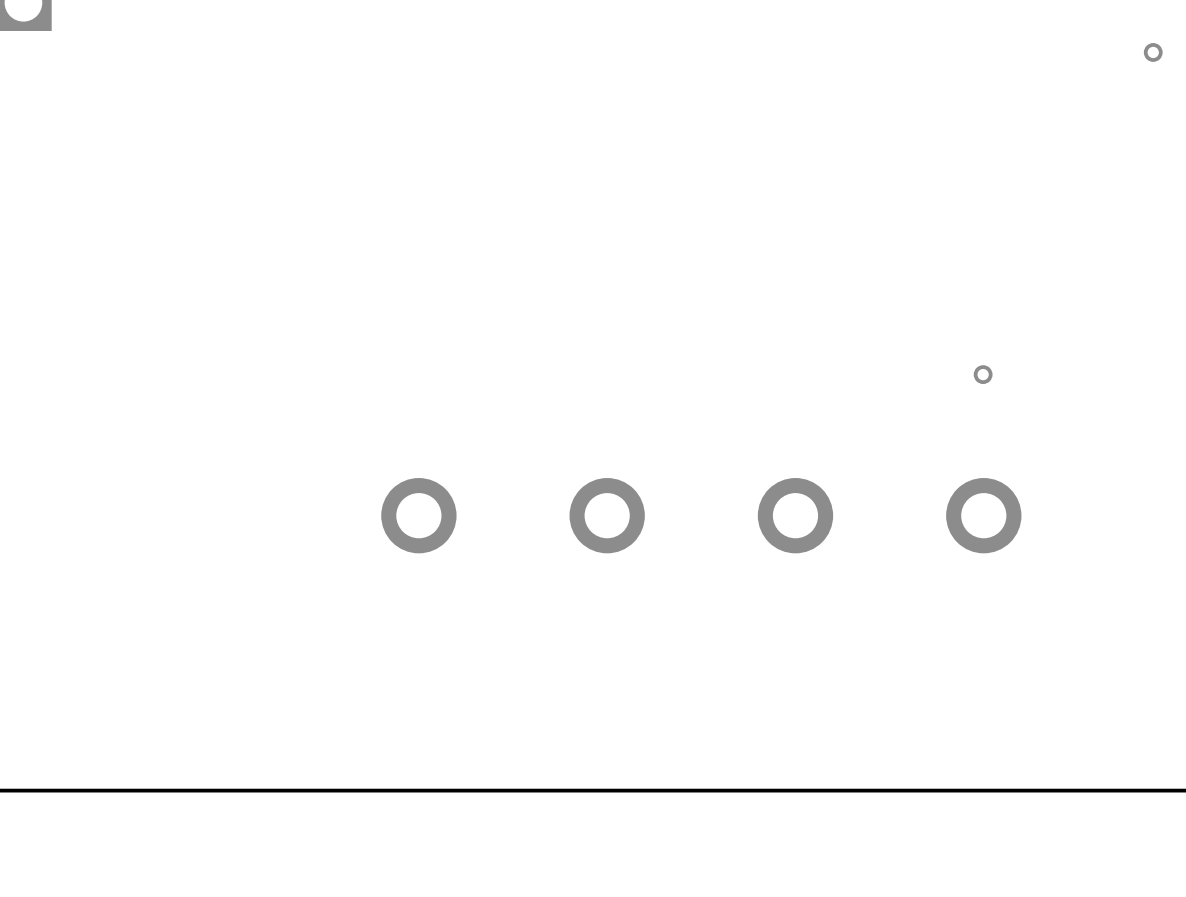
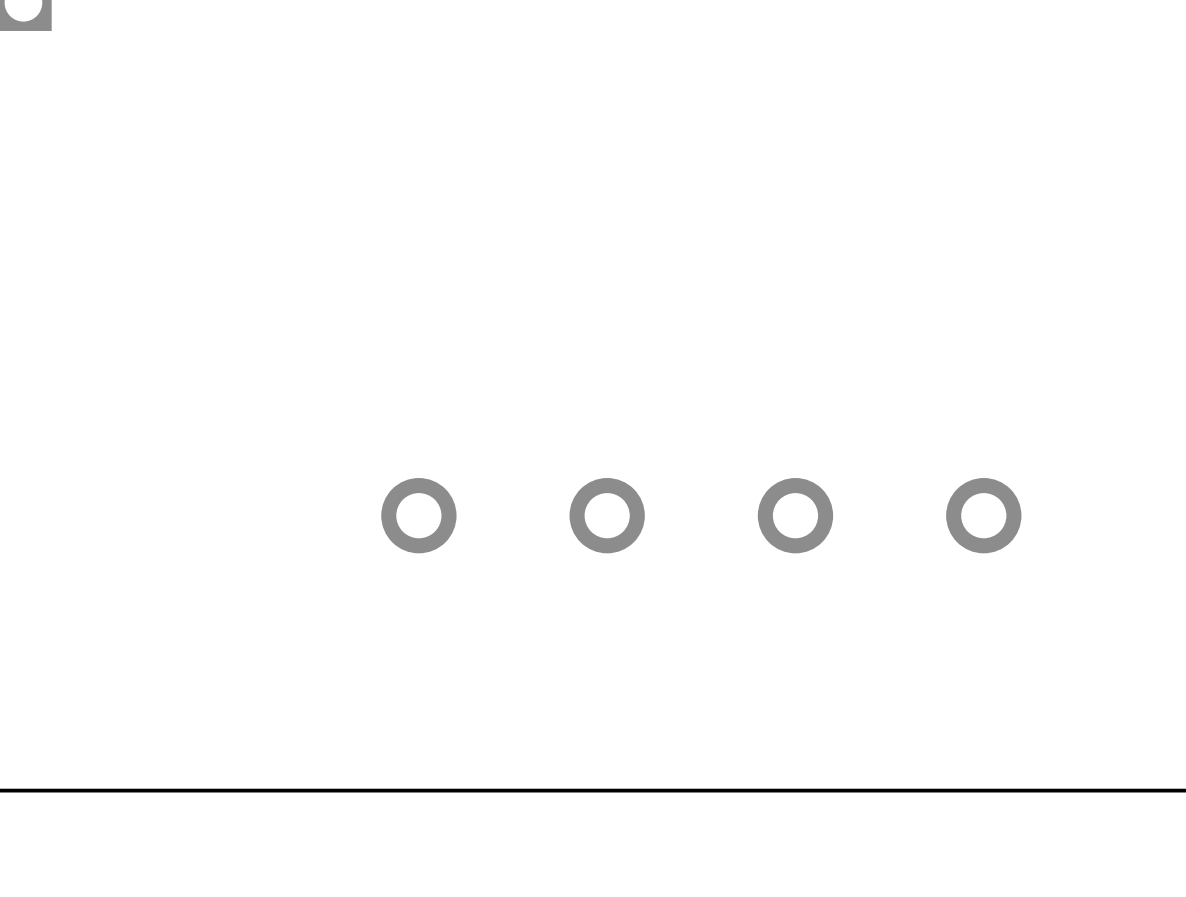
via: (1153, 52) -> none
via: (983, 374) -> none

